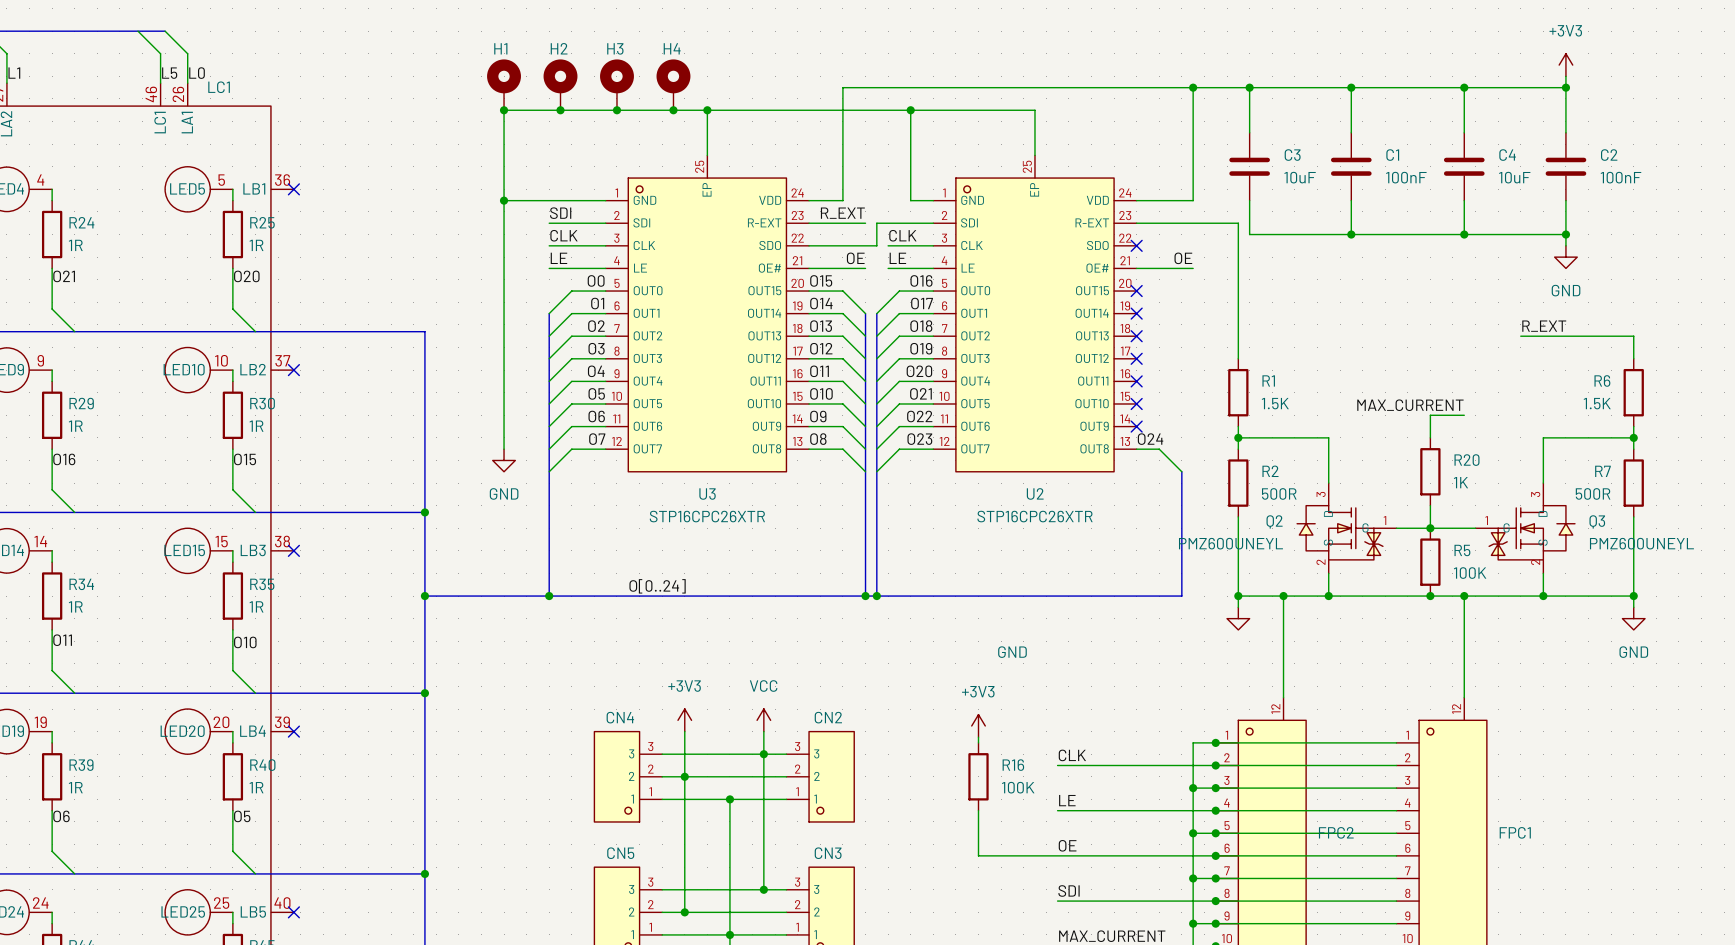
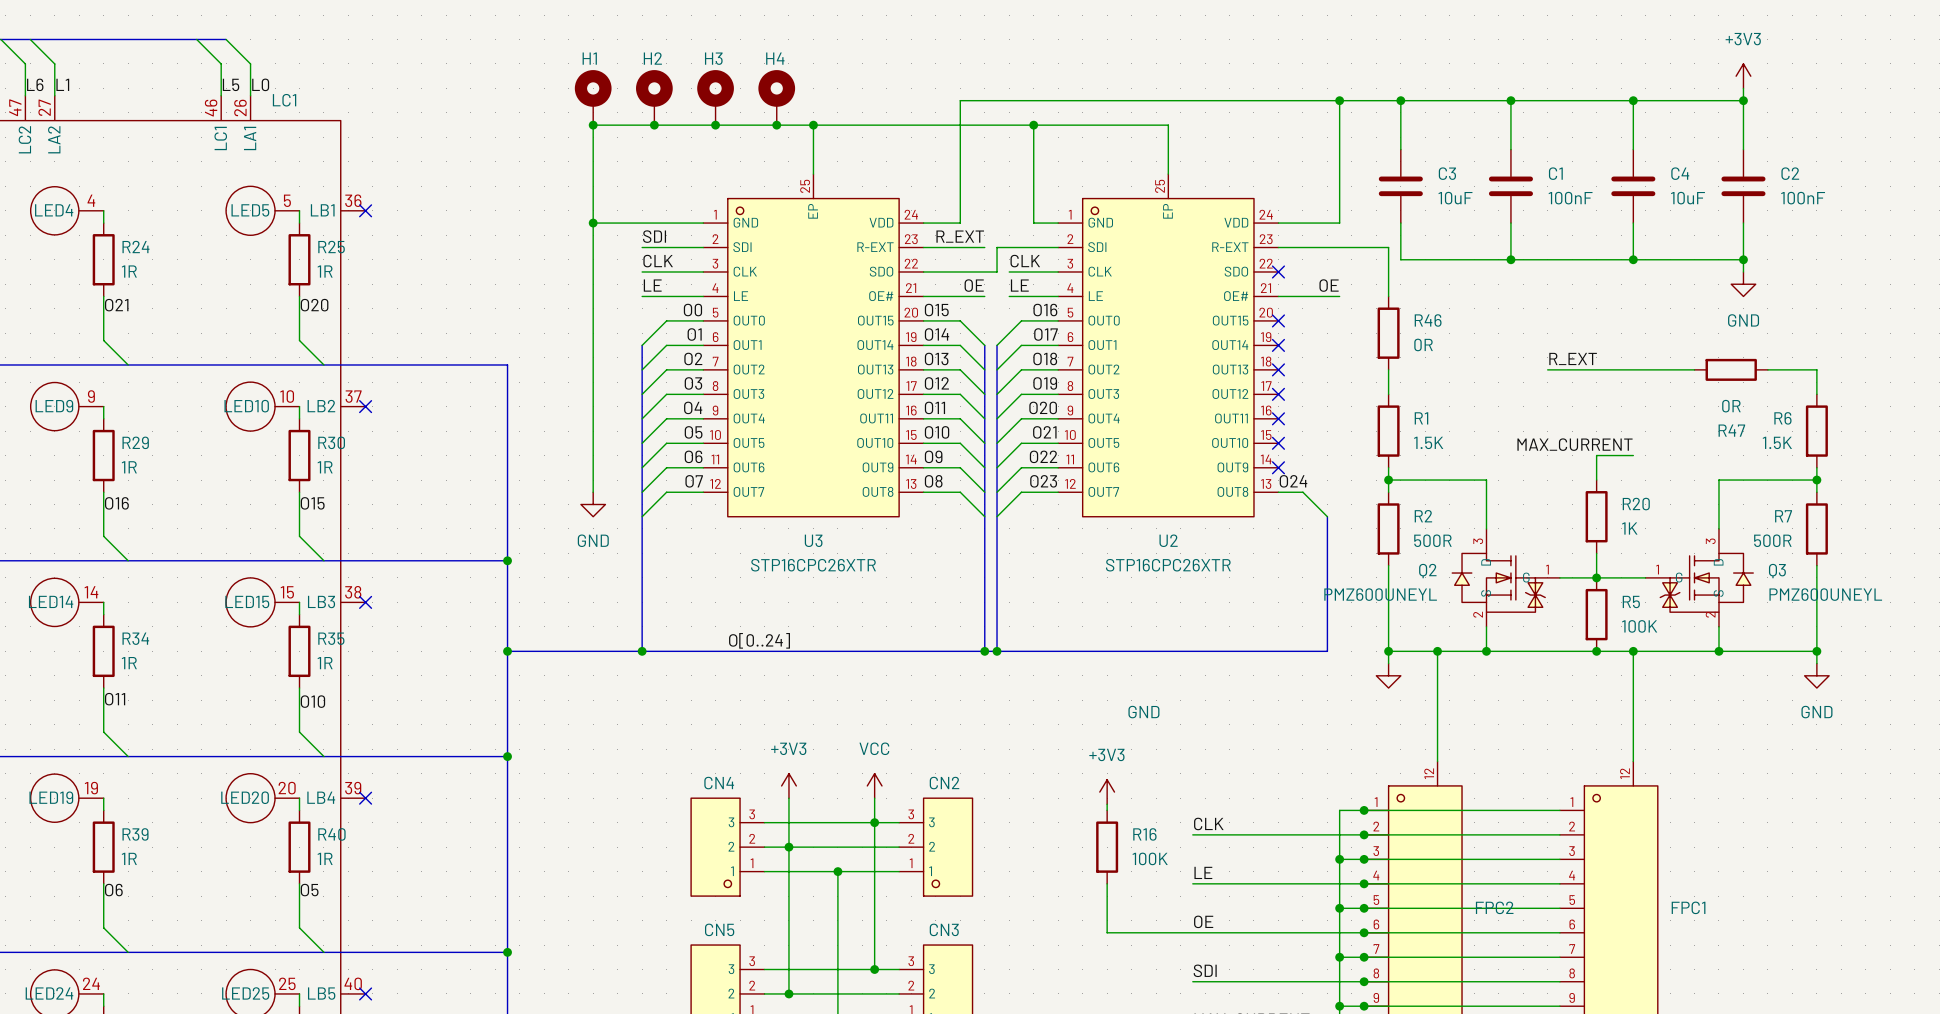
wire: (1238, 268) (1238, 336) -> none
R46: none -> 0R (1388, 333)
label position: R_EXT (1544, 326) -> R_EXT (1573, 358)
wire: (1520, 336) (1588, 336) -> (1694, 369) (1547, 369)
R47: none -> 0R (1731, 369)

